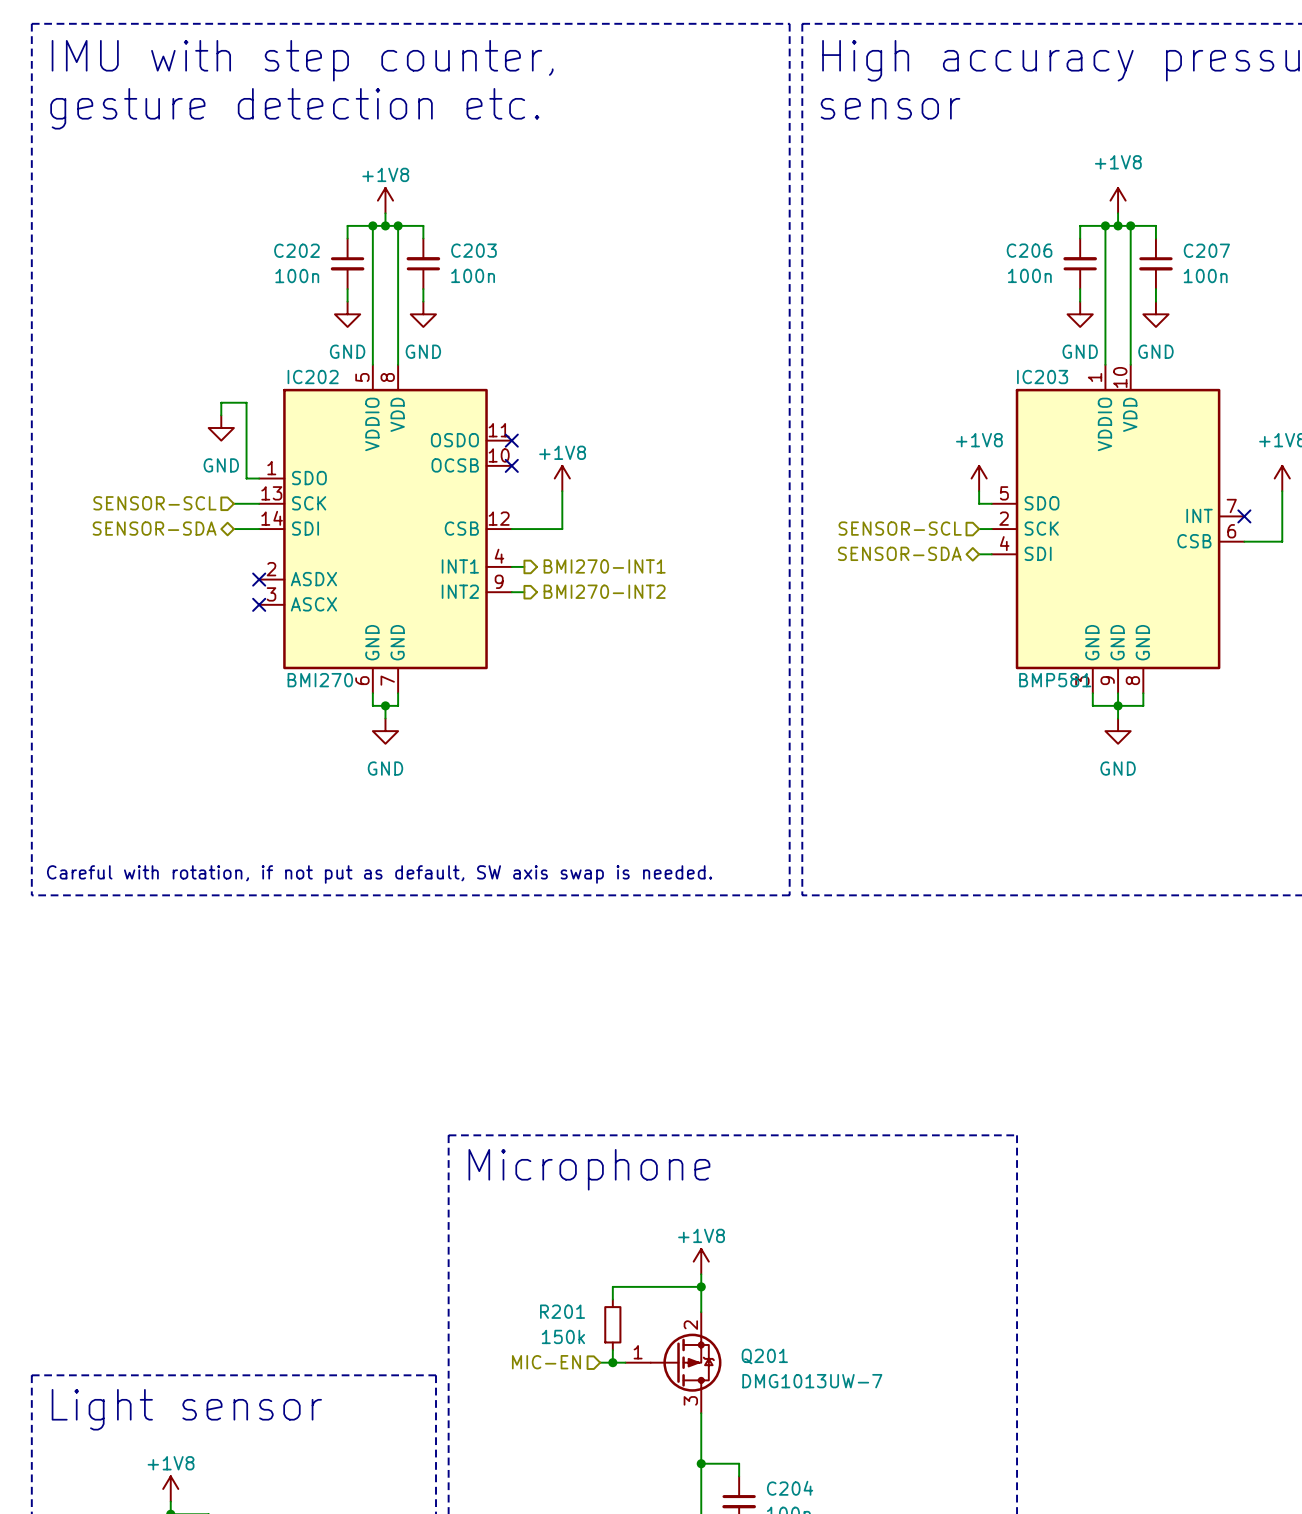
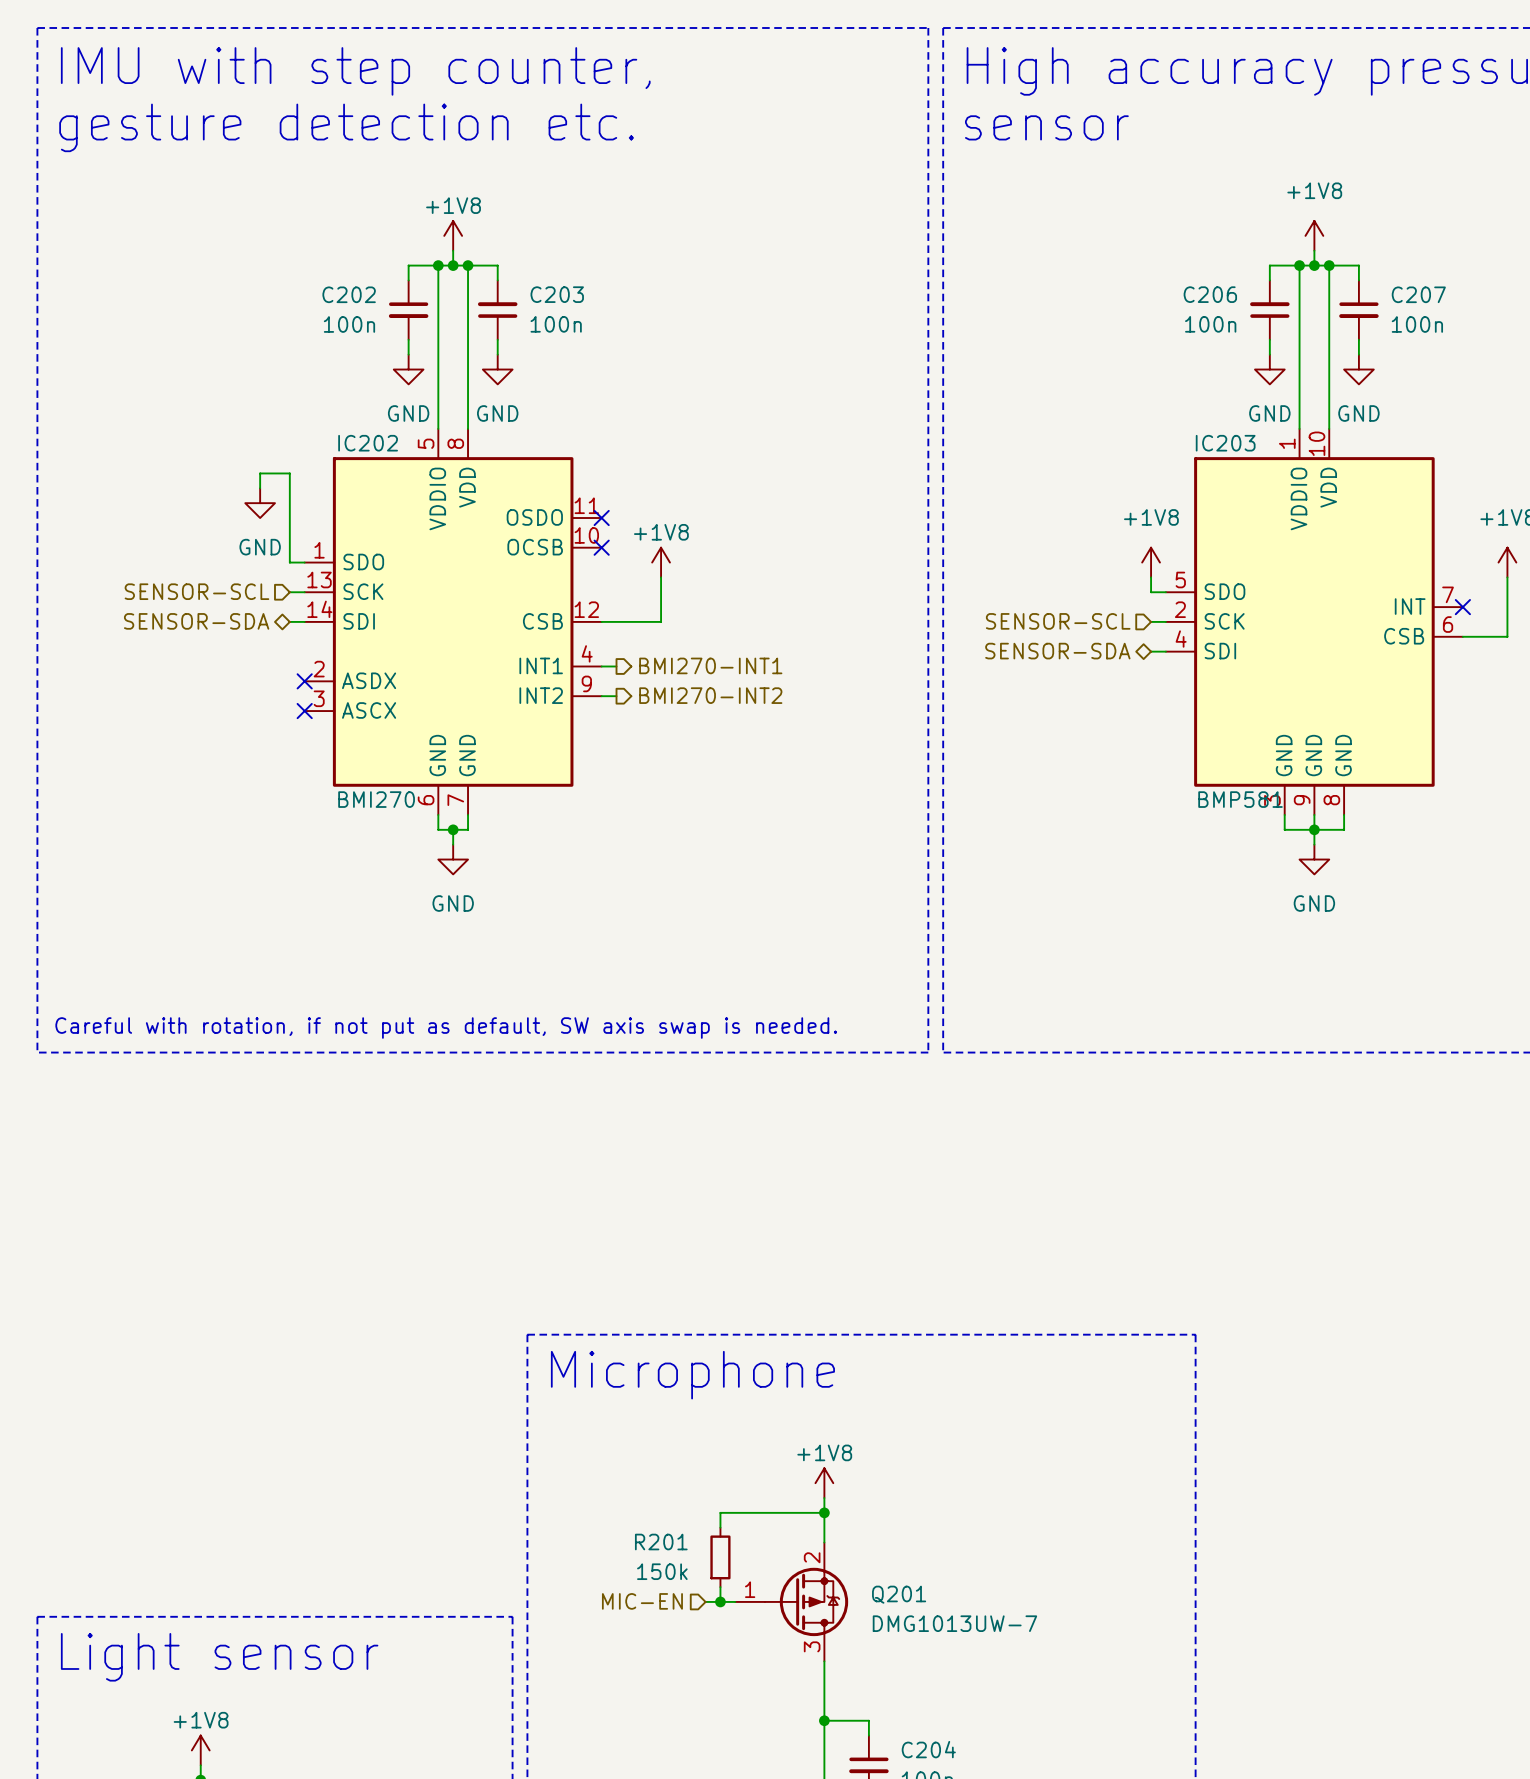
hierarchical label position: SENSOR-SCL (154, 503) -> SENSOR-SCL (196, 591)
wire: (233, 503) (246, 503) -> none
hierarchical label position: SENSOR-SDA (154, 528) -> SENSOR-SDA (196, 621)
wire: (233, 529) (246, 529) -> none

